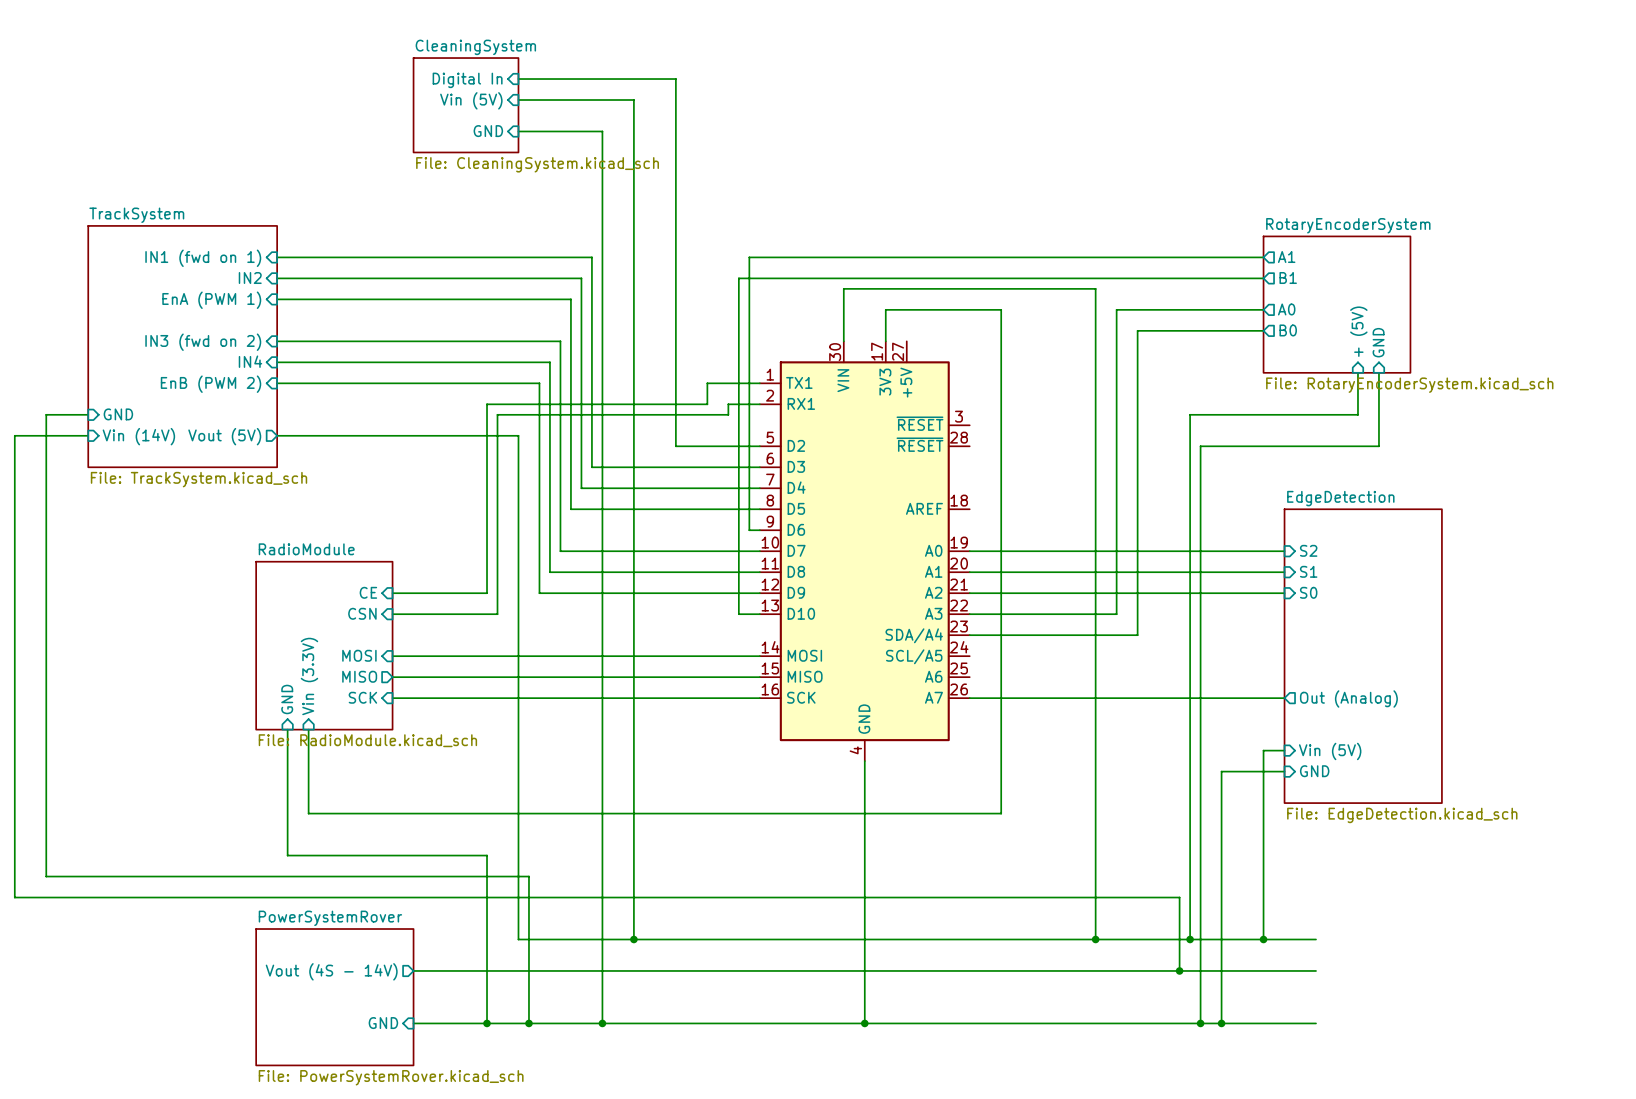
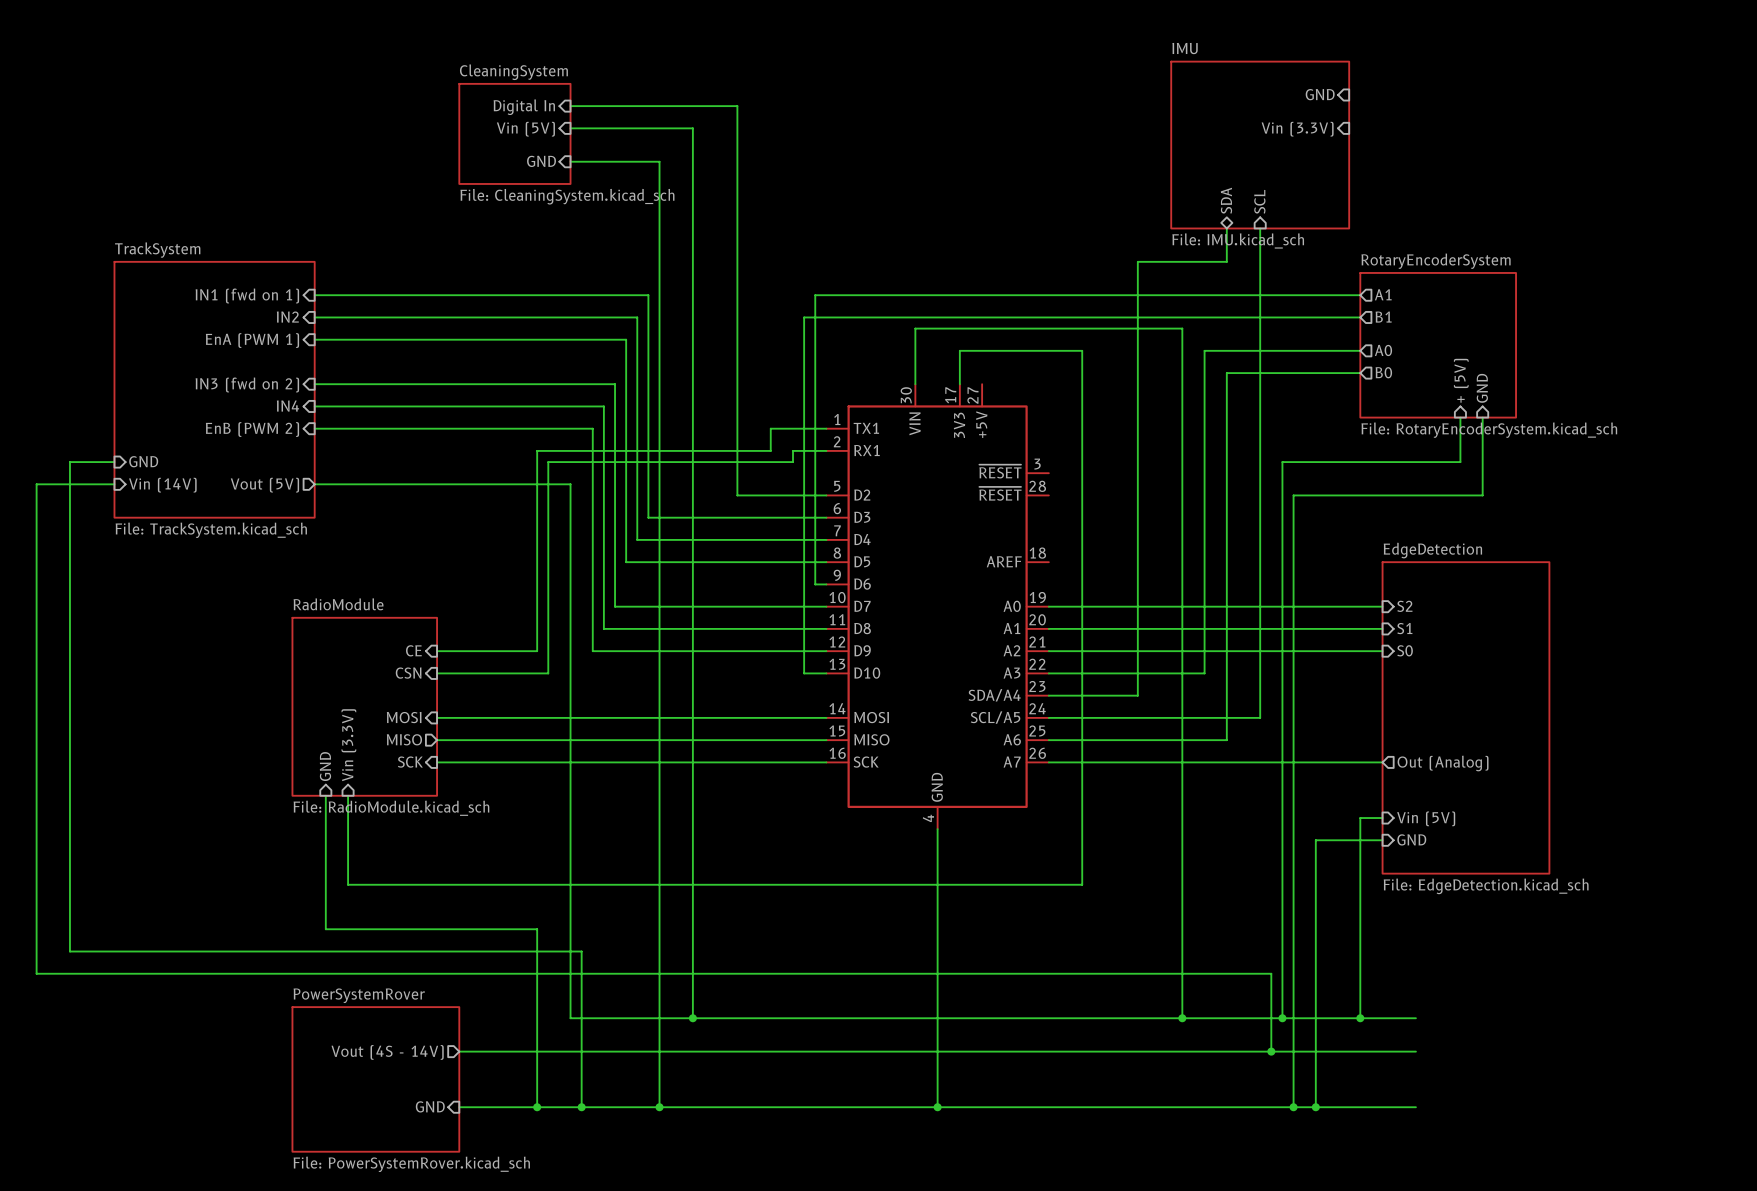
sheet pin: none -> GND (1320, 94)
sheet pin: none -> Vin (3.3V) (1297, 129)
sheet IMU: none -> File: IMU.kicad_sch (1260, 145)
sheet pin: none -> SDA (1226, 200)
sheet pin: none -> SCL (1259, 201)
wire: none -> (1226, 228) (1226, 261) (1137, 261) (1137, 695)
wire: none -> (1260, 228) (1260, 717) (1048, 717)
wire: (1053, 635) (1137, 635) -> (1048, 740) (1226, 740) (1226, 695)

